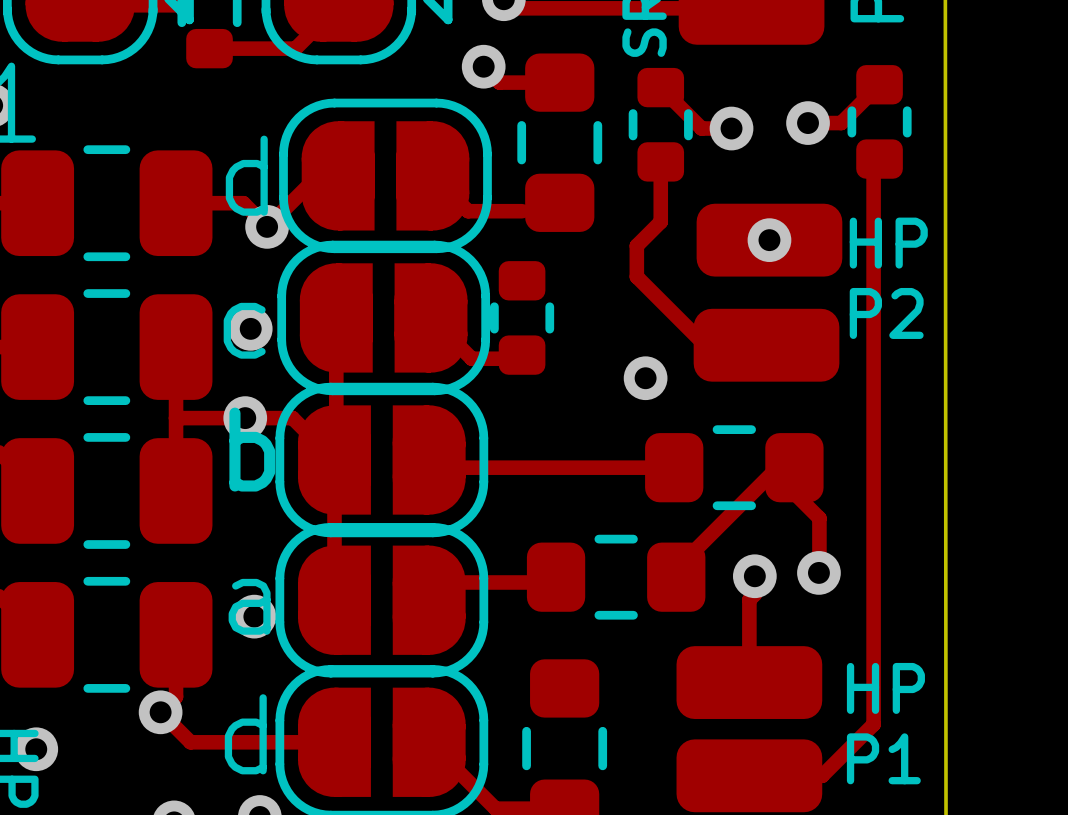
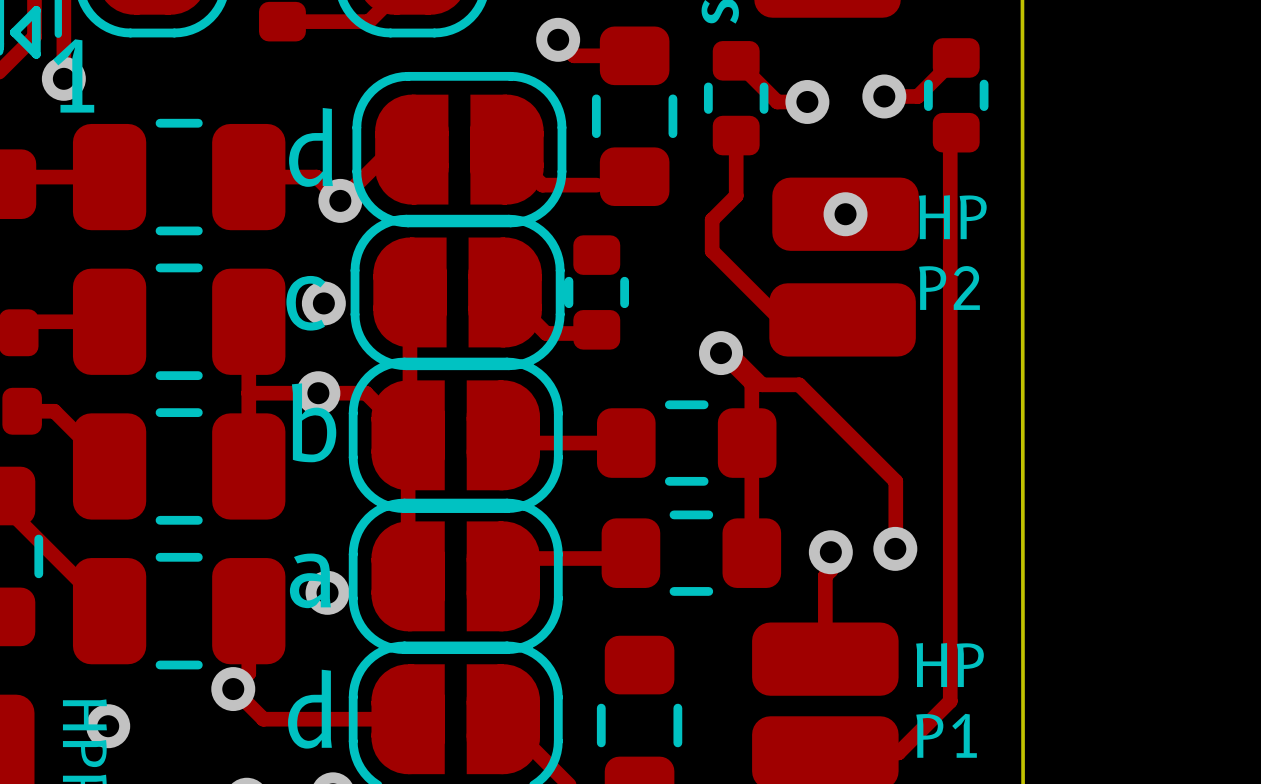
track: (551, 467) (674, 467) -> none
part position: (734, 467) -> (686, 443)
track: (819, 518) (794, 493) (794, 467) (777, 467) (676, 569) -> (895, 493) (895, 481) (799, 384) (762, 384) (730, 353) (720, 353) (751, 383) (751, 545)

